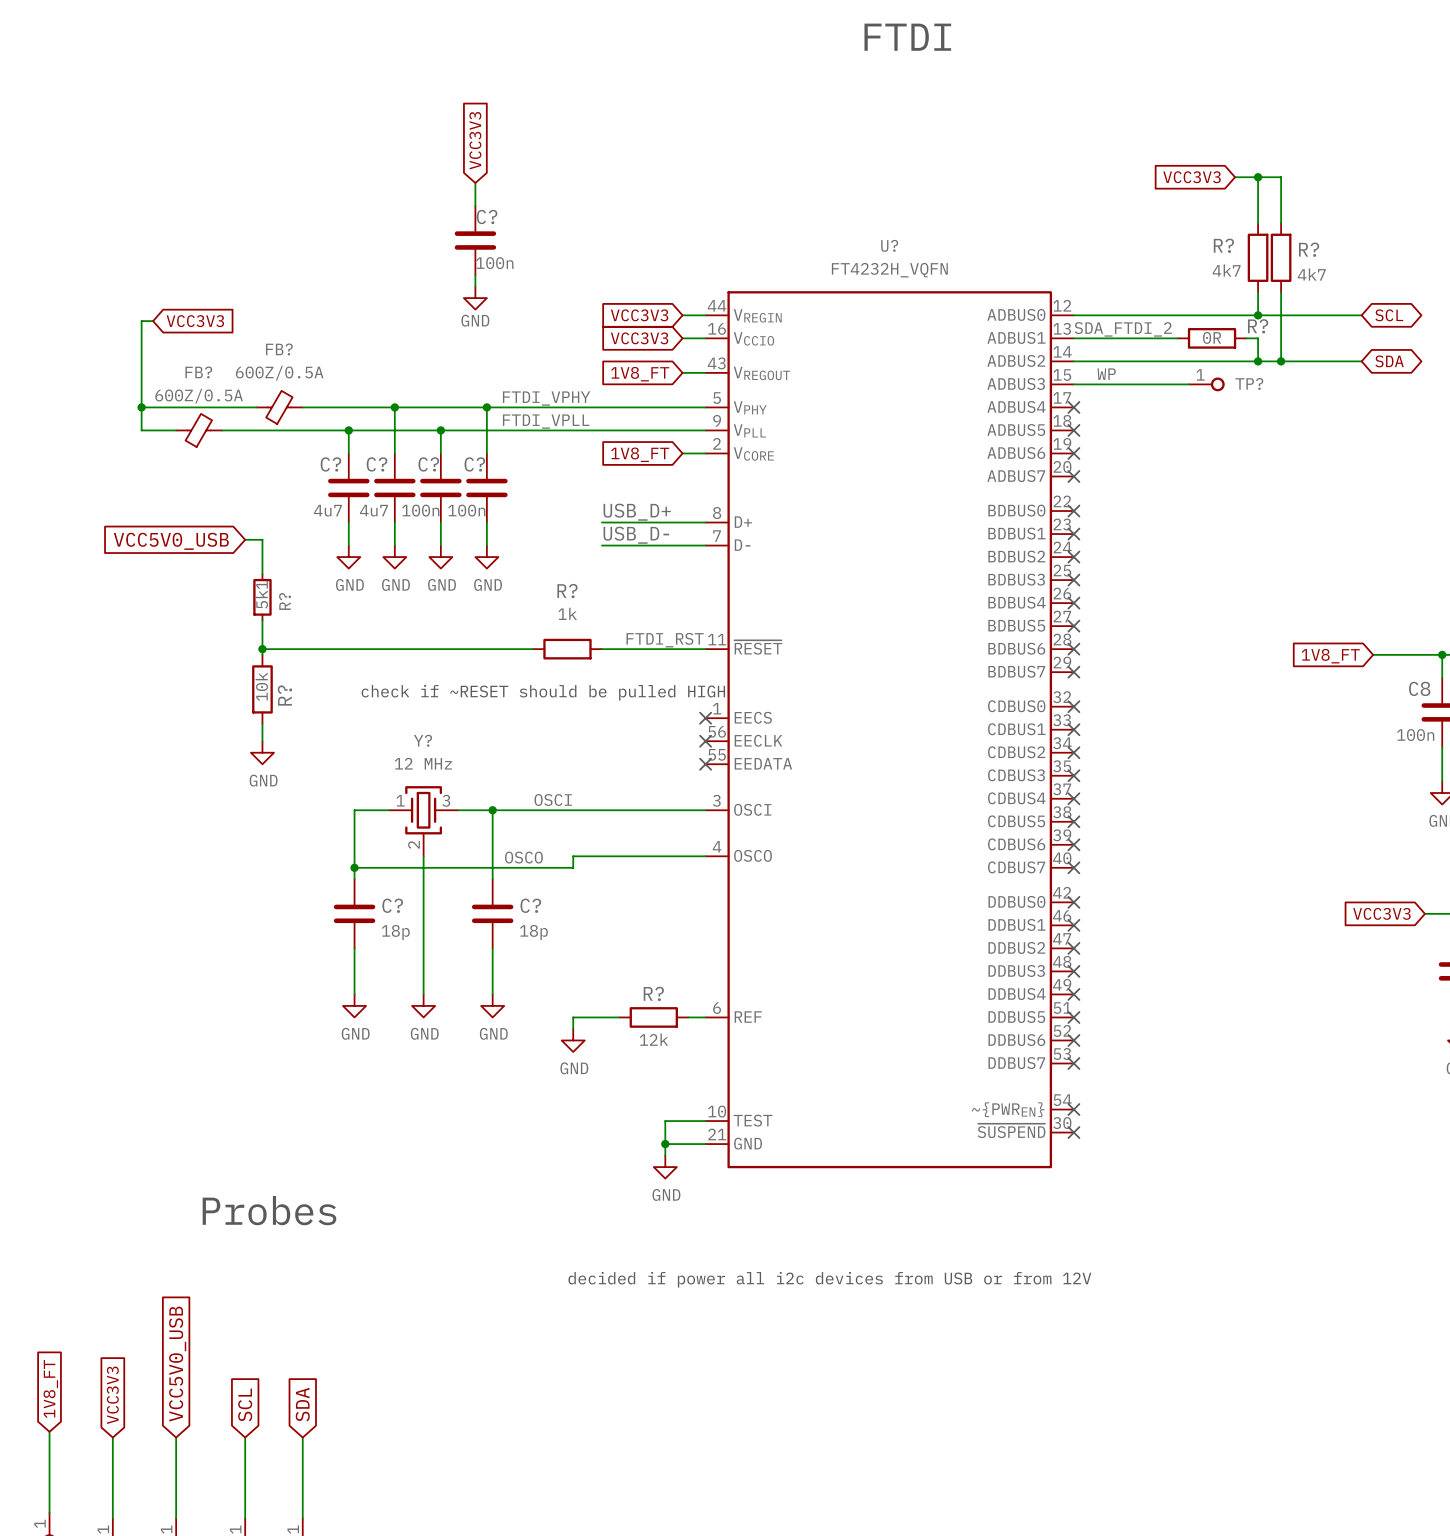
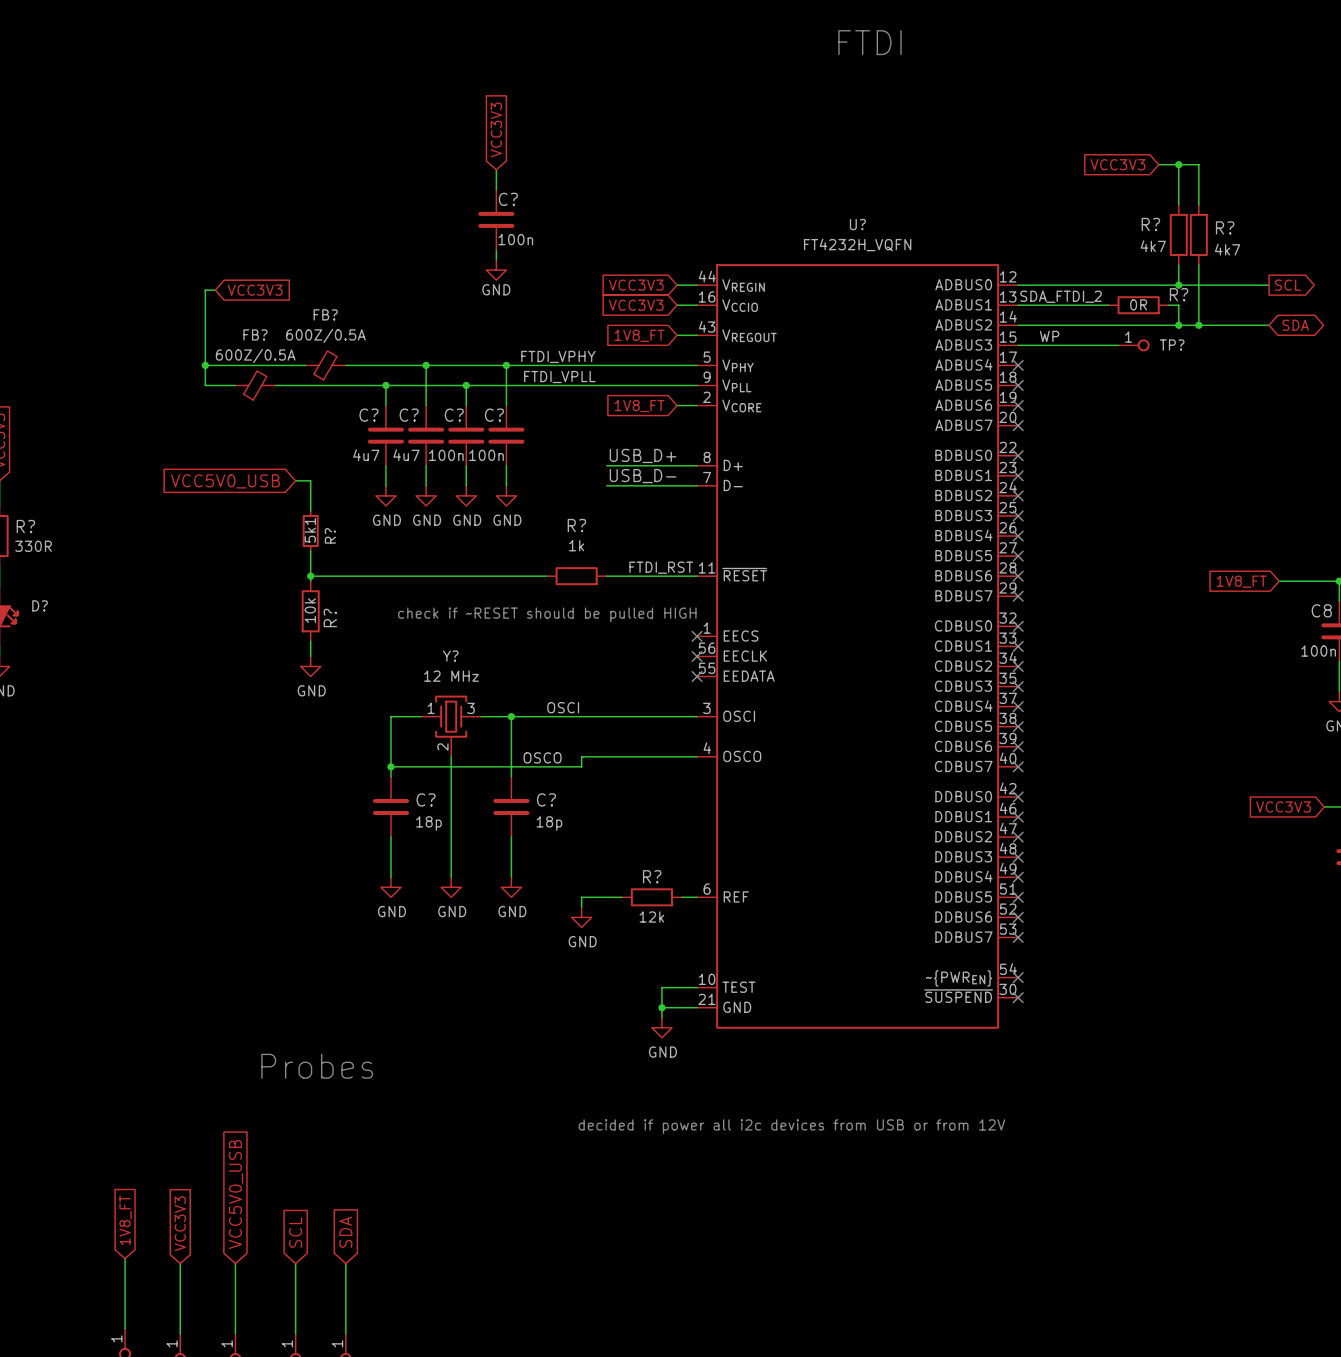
global label shape: bidirectional (1389, 315) -> output (1287, 285)

